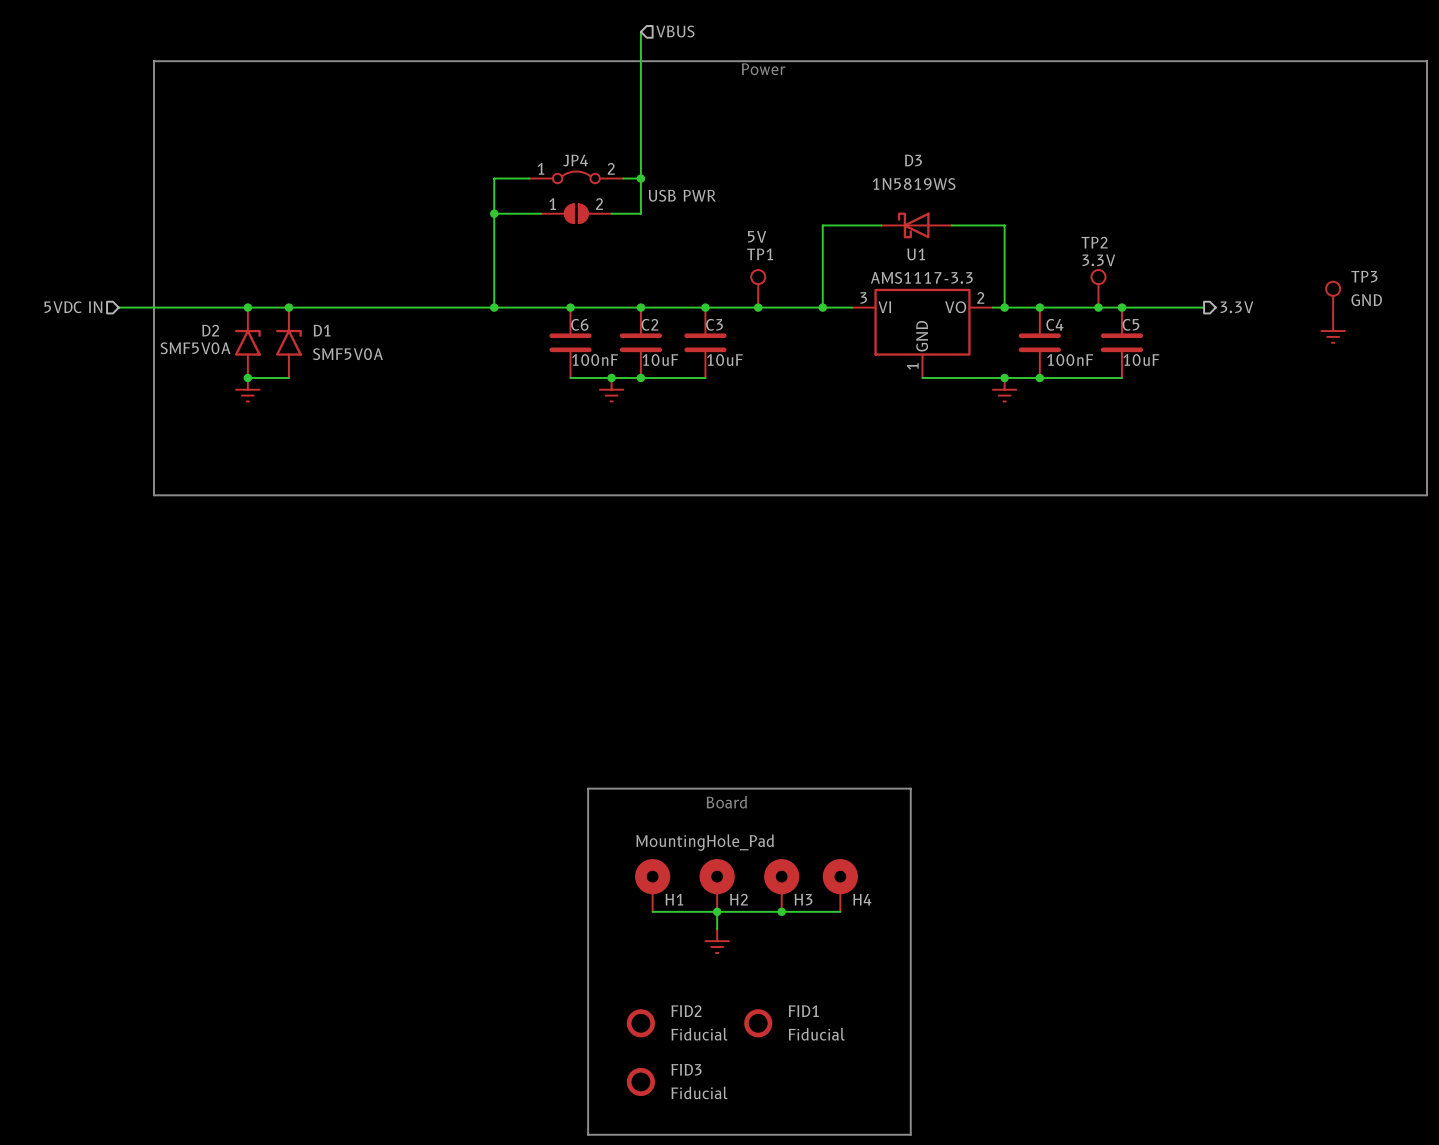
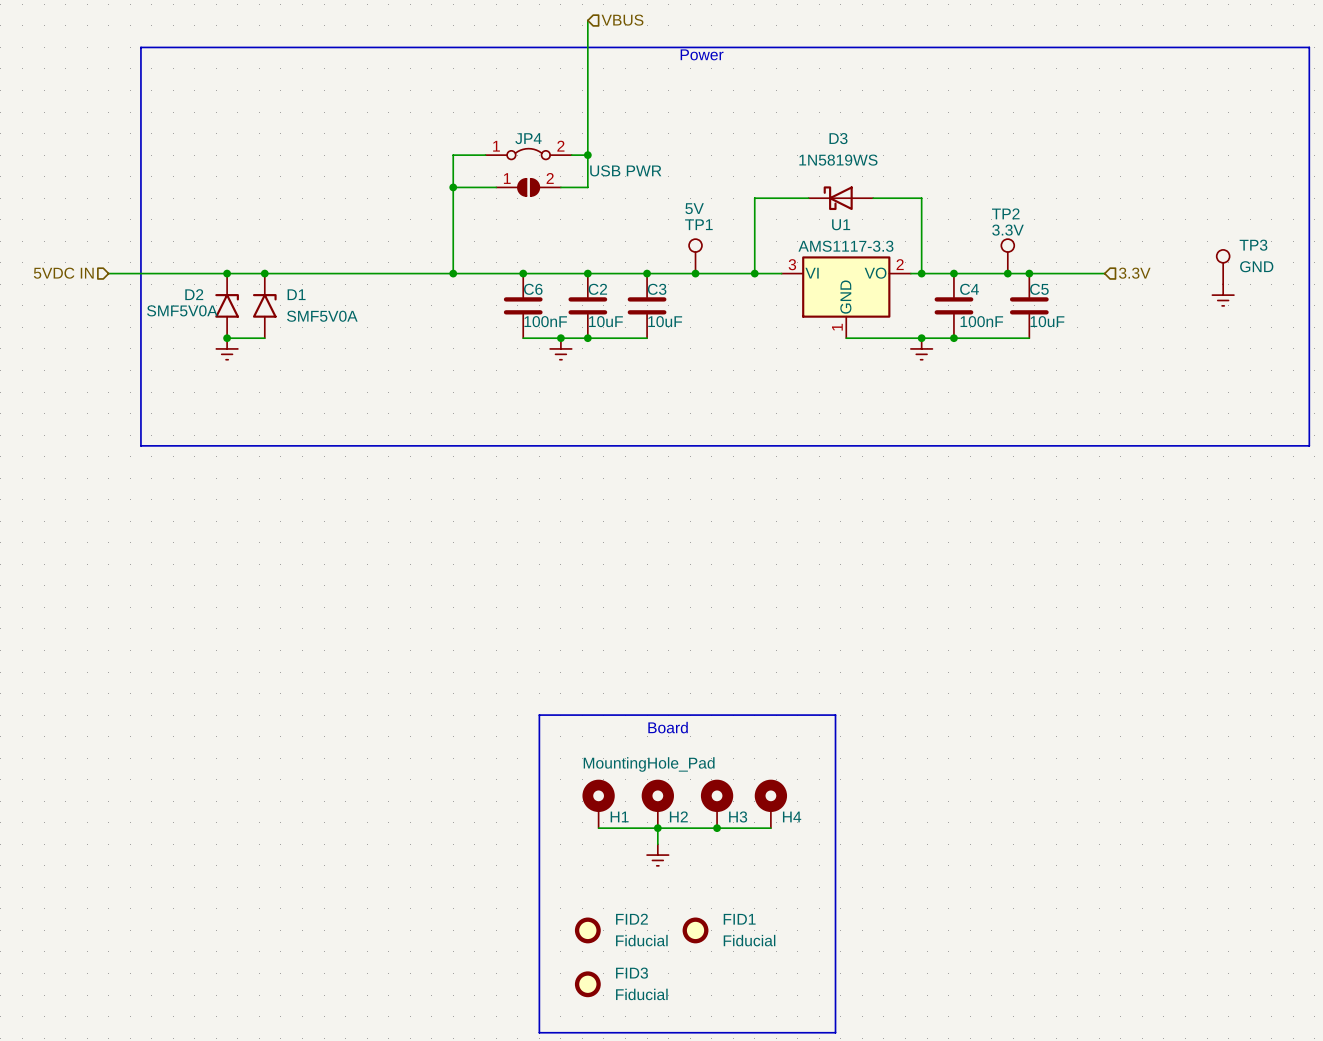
hierarchical label shape: output (1236, 307) -> input (1134, 273)

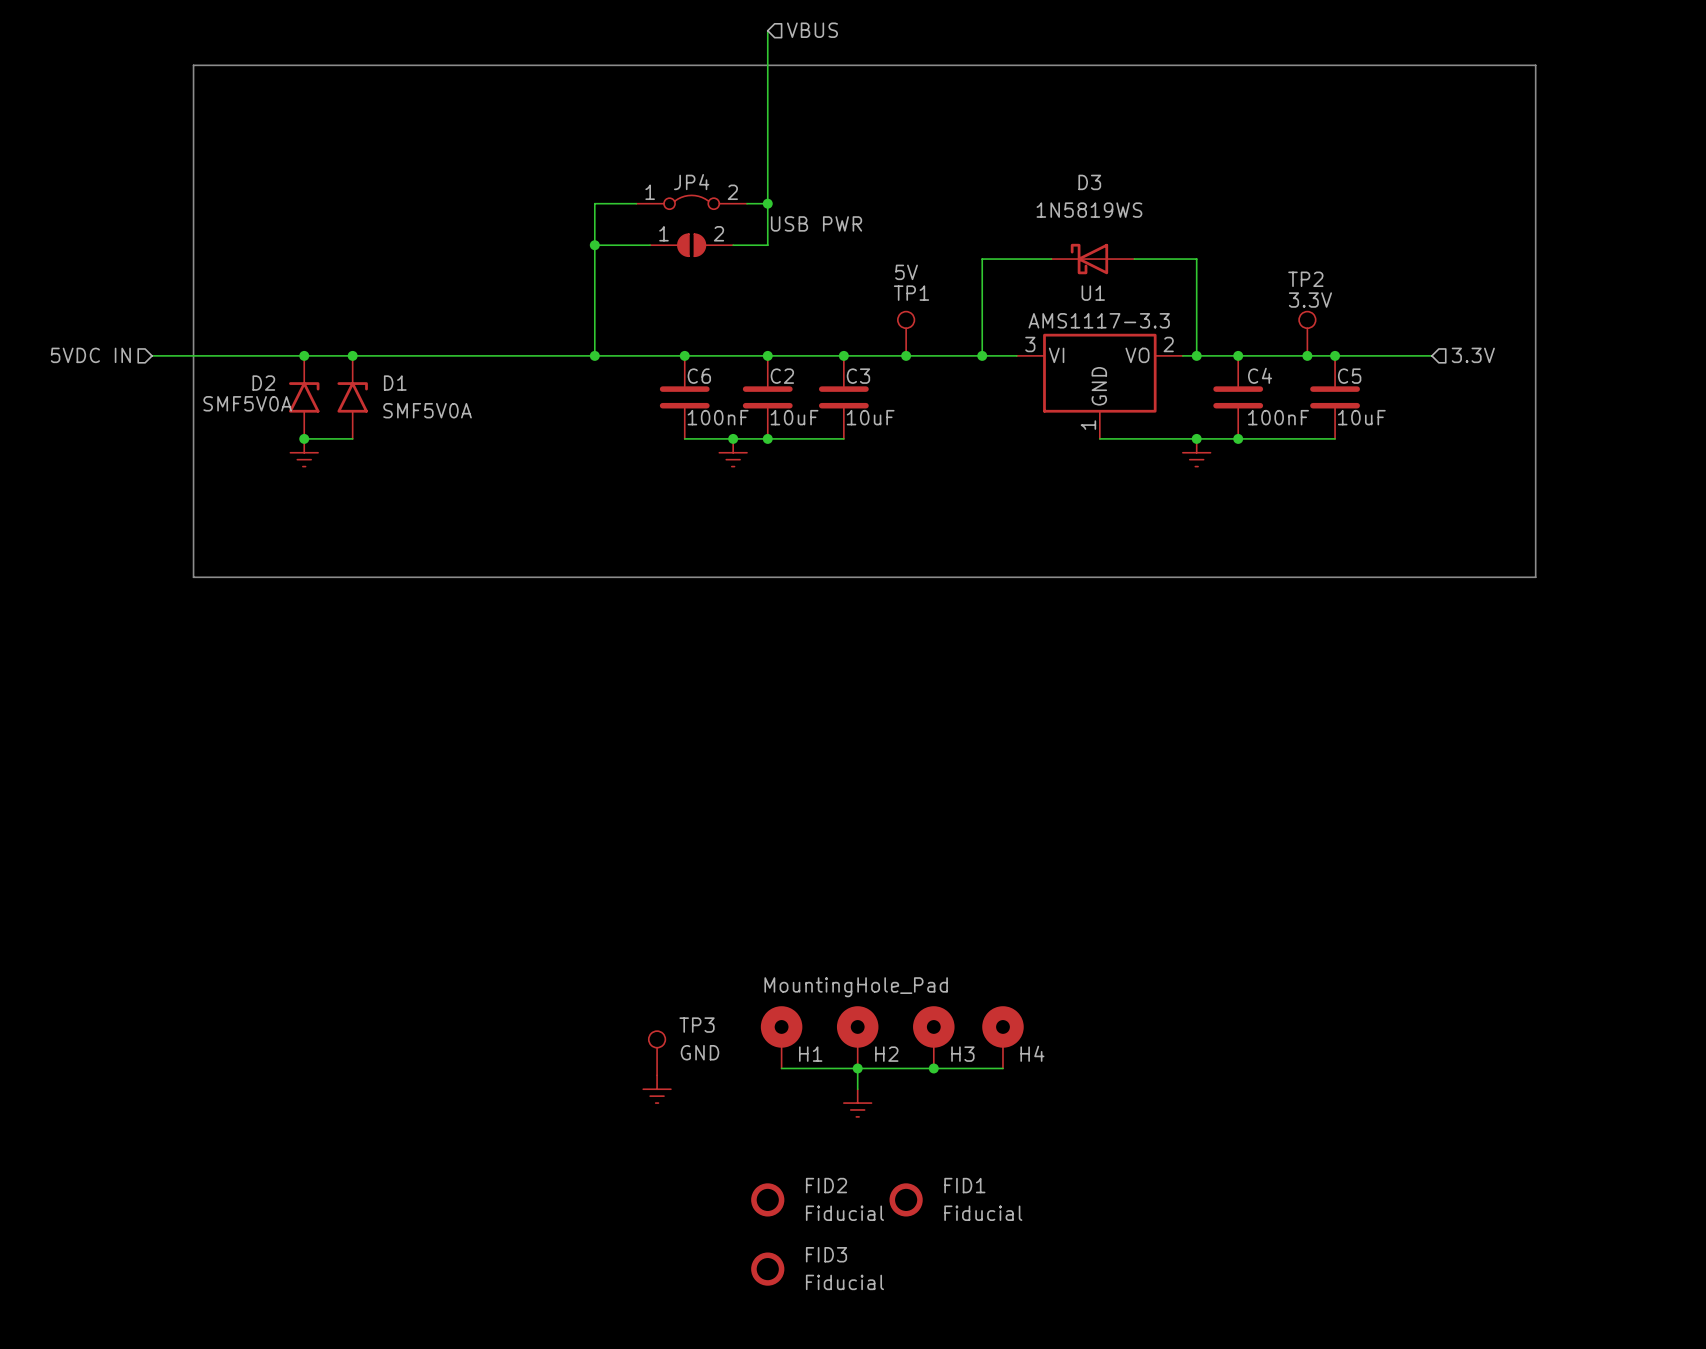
line: (1185, 47) (1309, 47) (1309, 445) (1185, 445) -> (1535, 65) (1535, 577)
text: Power (702, 54) -> none
TP3 position: (1223, 267) -> (657, 1053)
power symbol: (1223, 295) -> none
line: (539, 715) (835, 715) (835, 1032) (539, 1032) (539, 715) -> none
text: Board (668, 727) -> none
power symbol: none -> (657, 1089)

